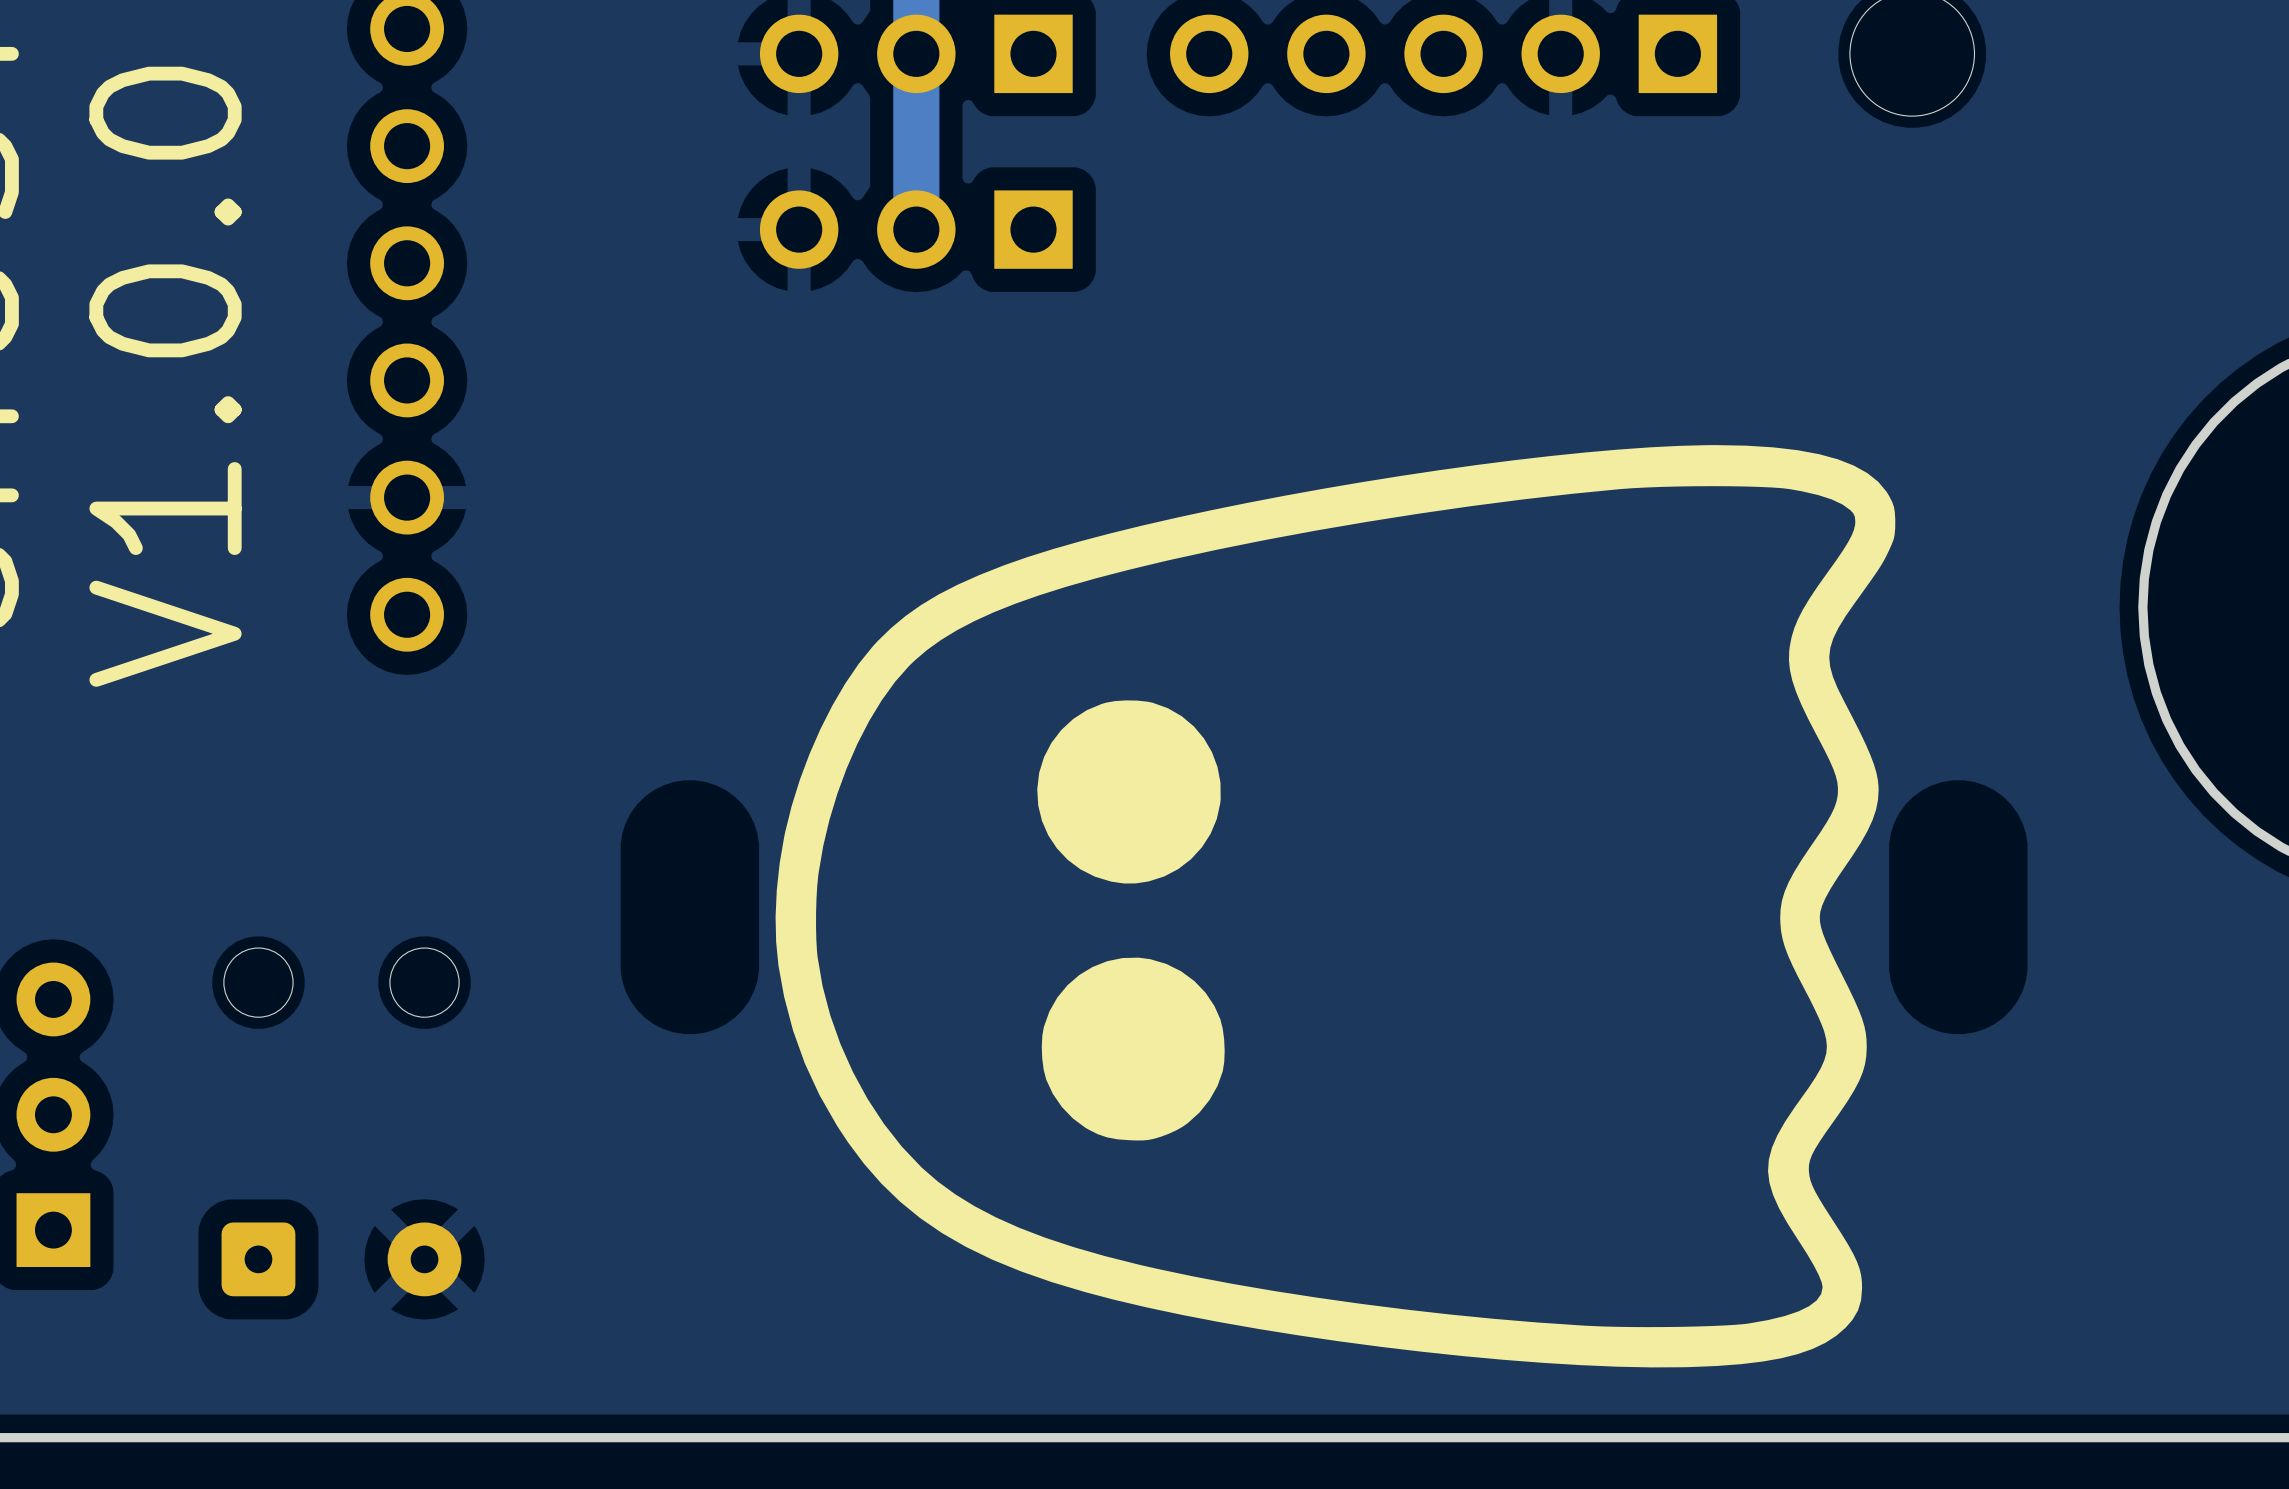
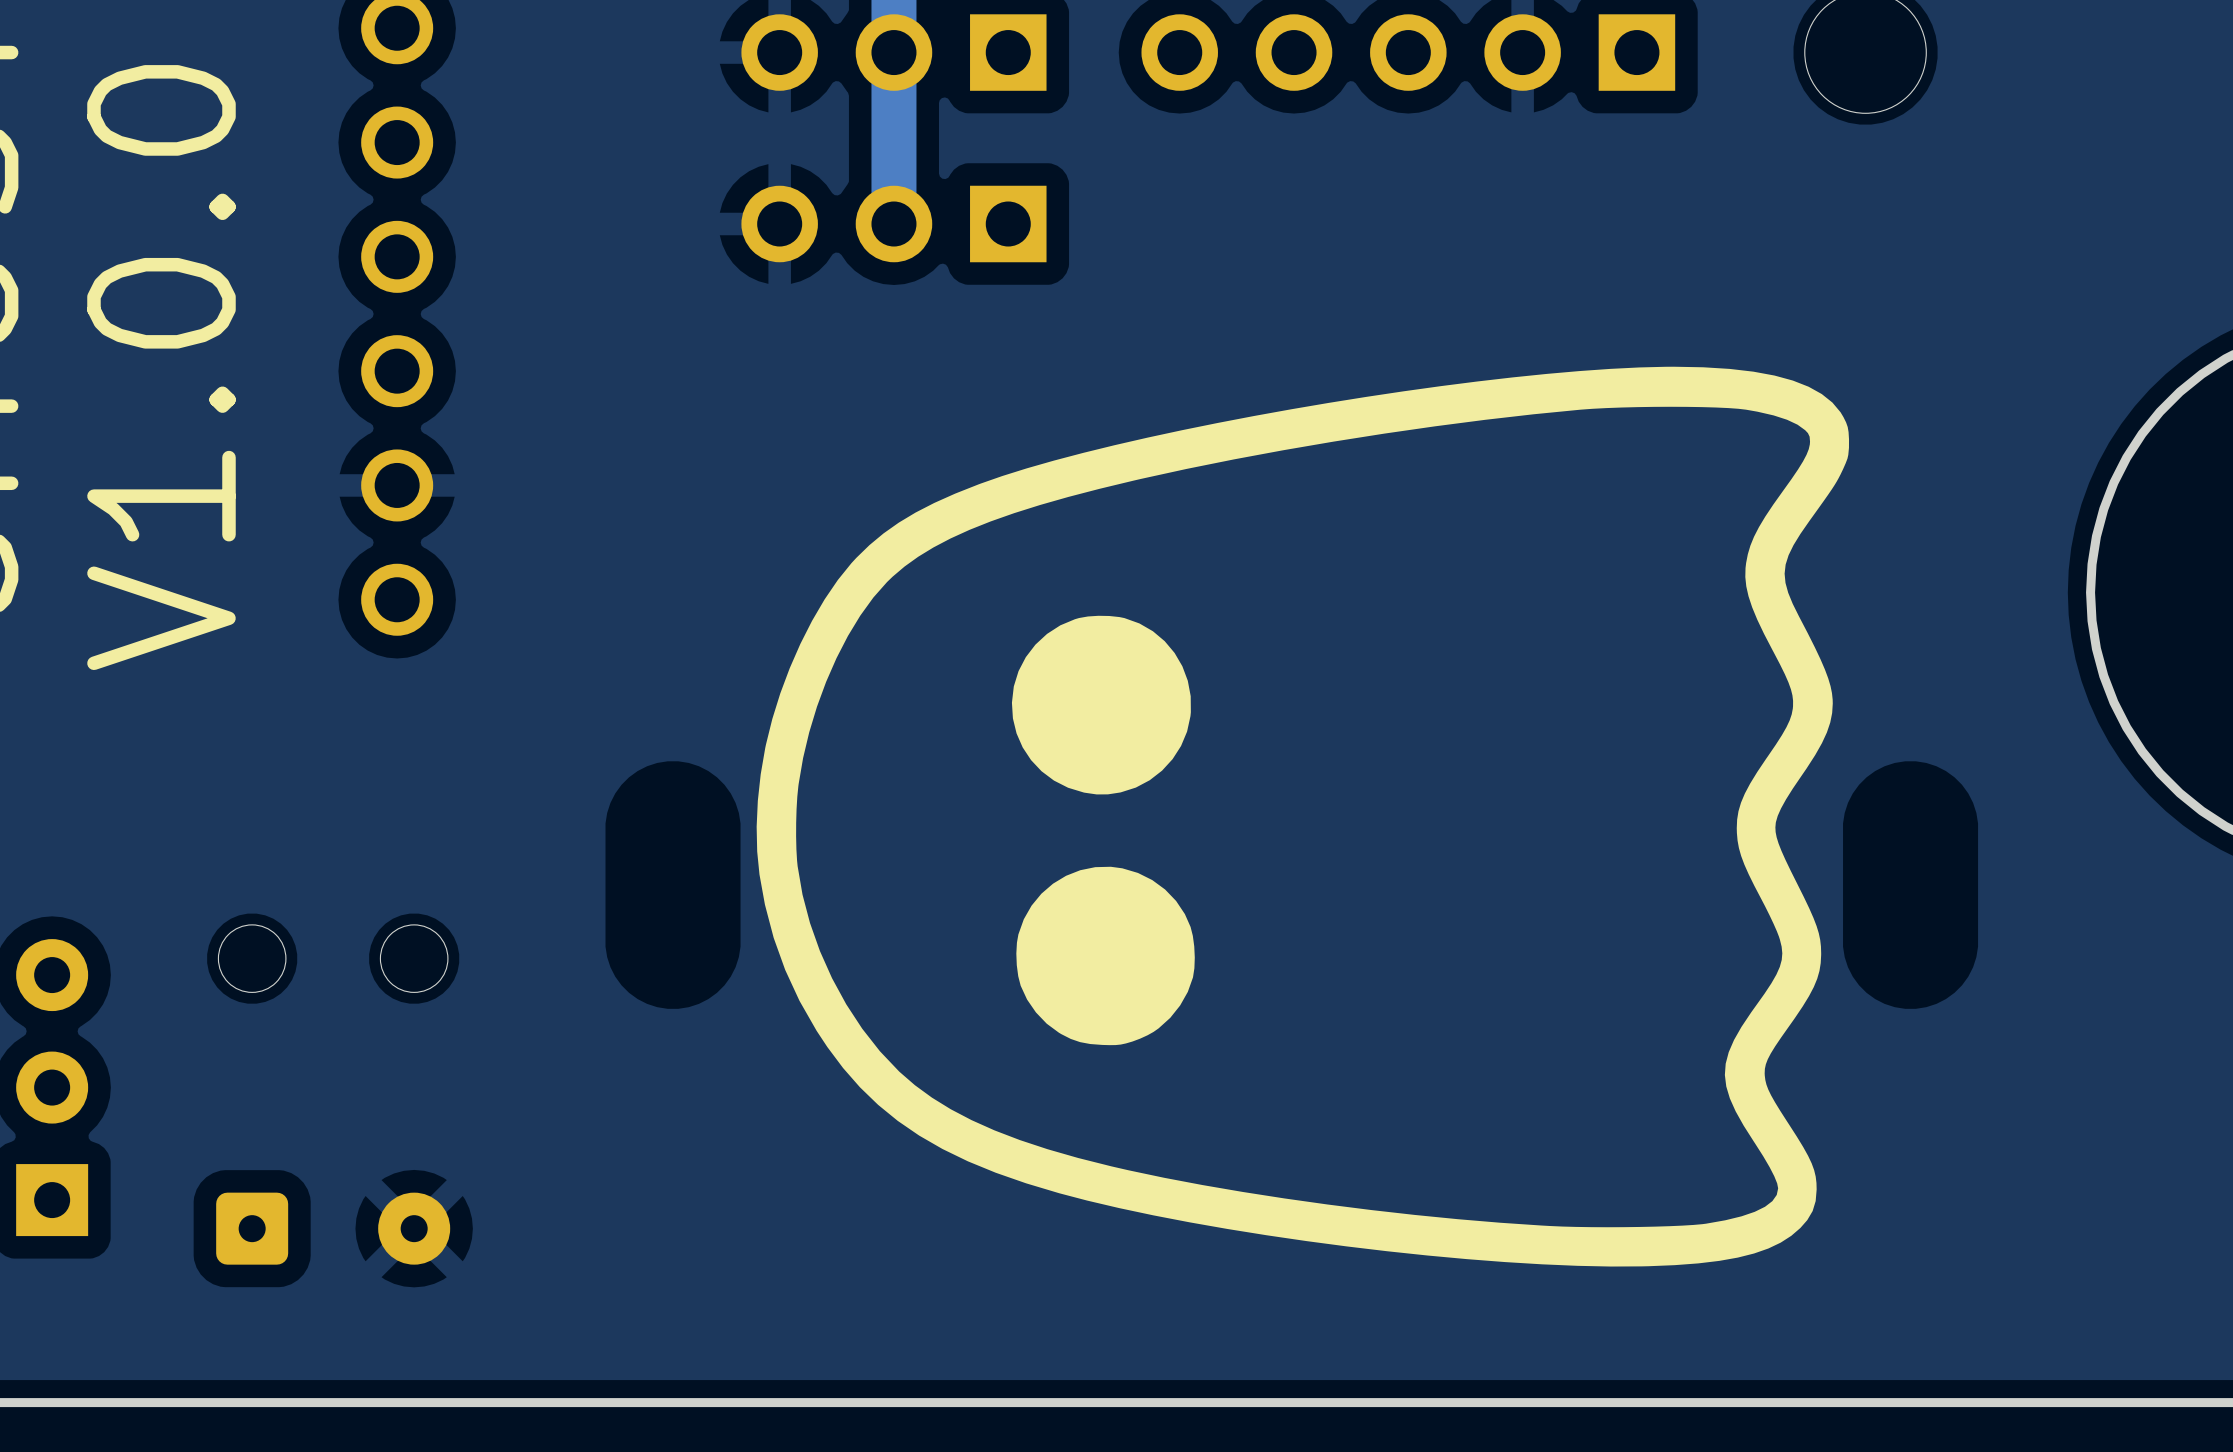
drawing position: (1335, 906) -> (1302, 816)

